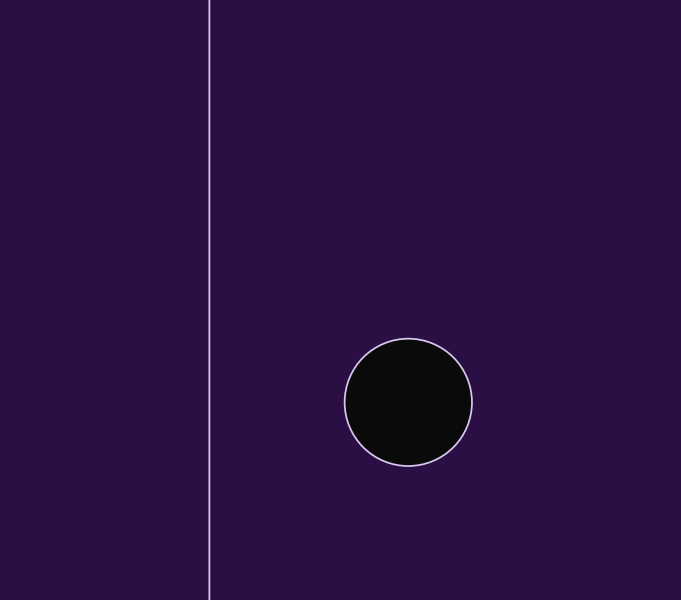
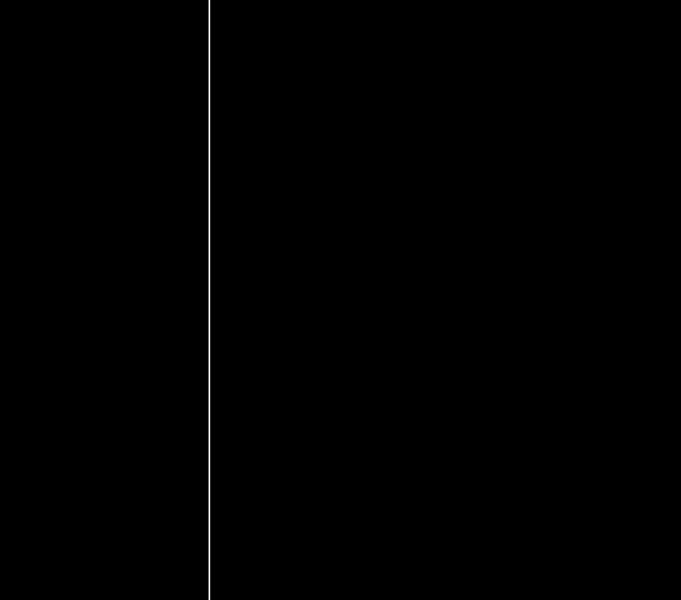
hole: (408, 402) -> none

